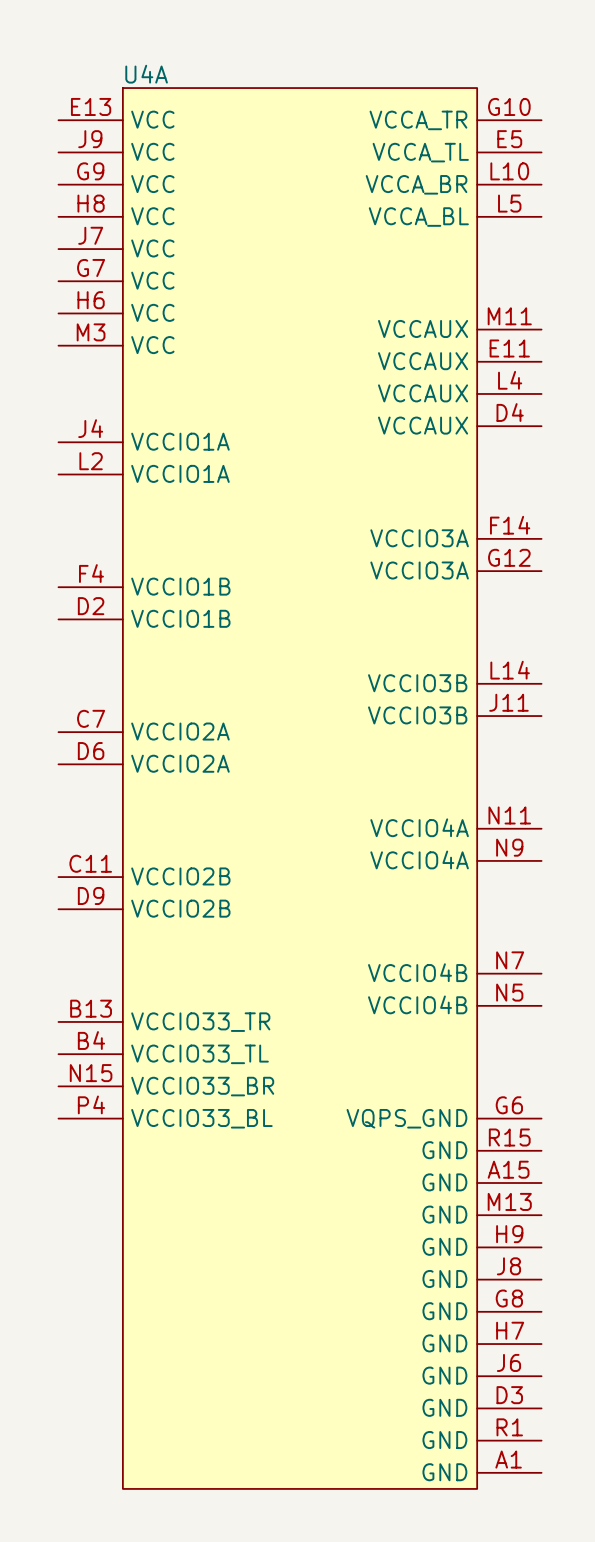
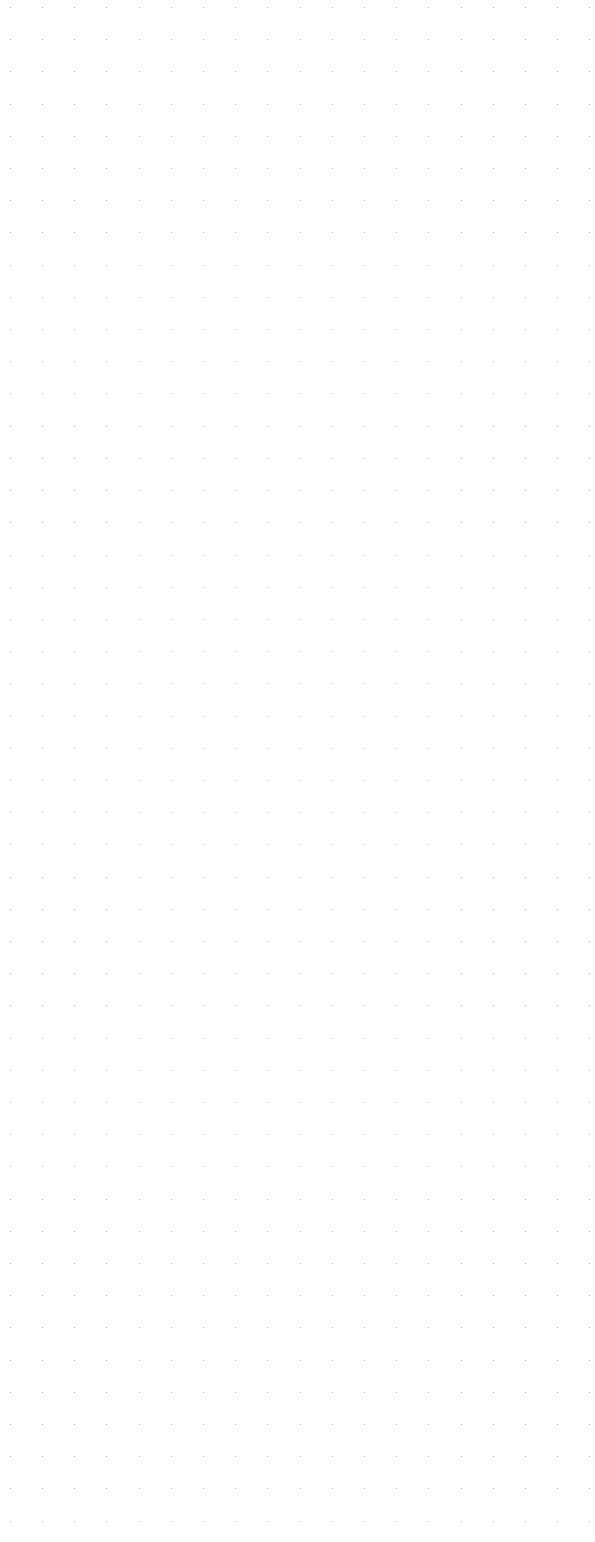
U4A: (300, 788) -> none

